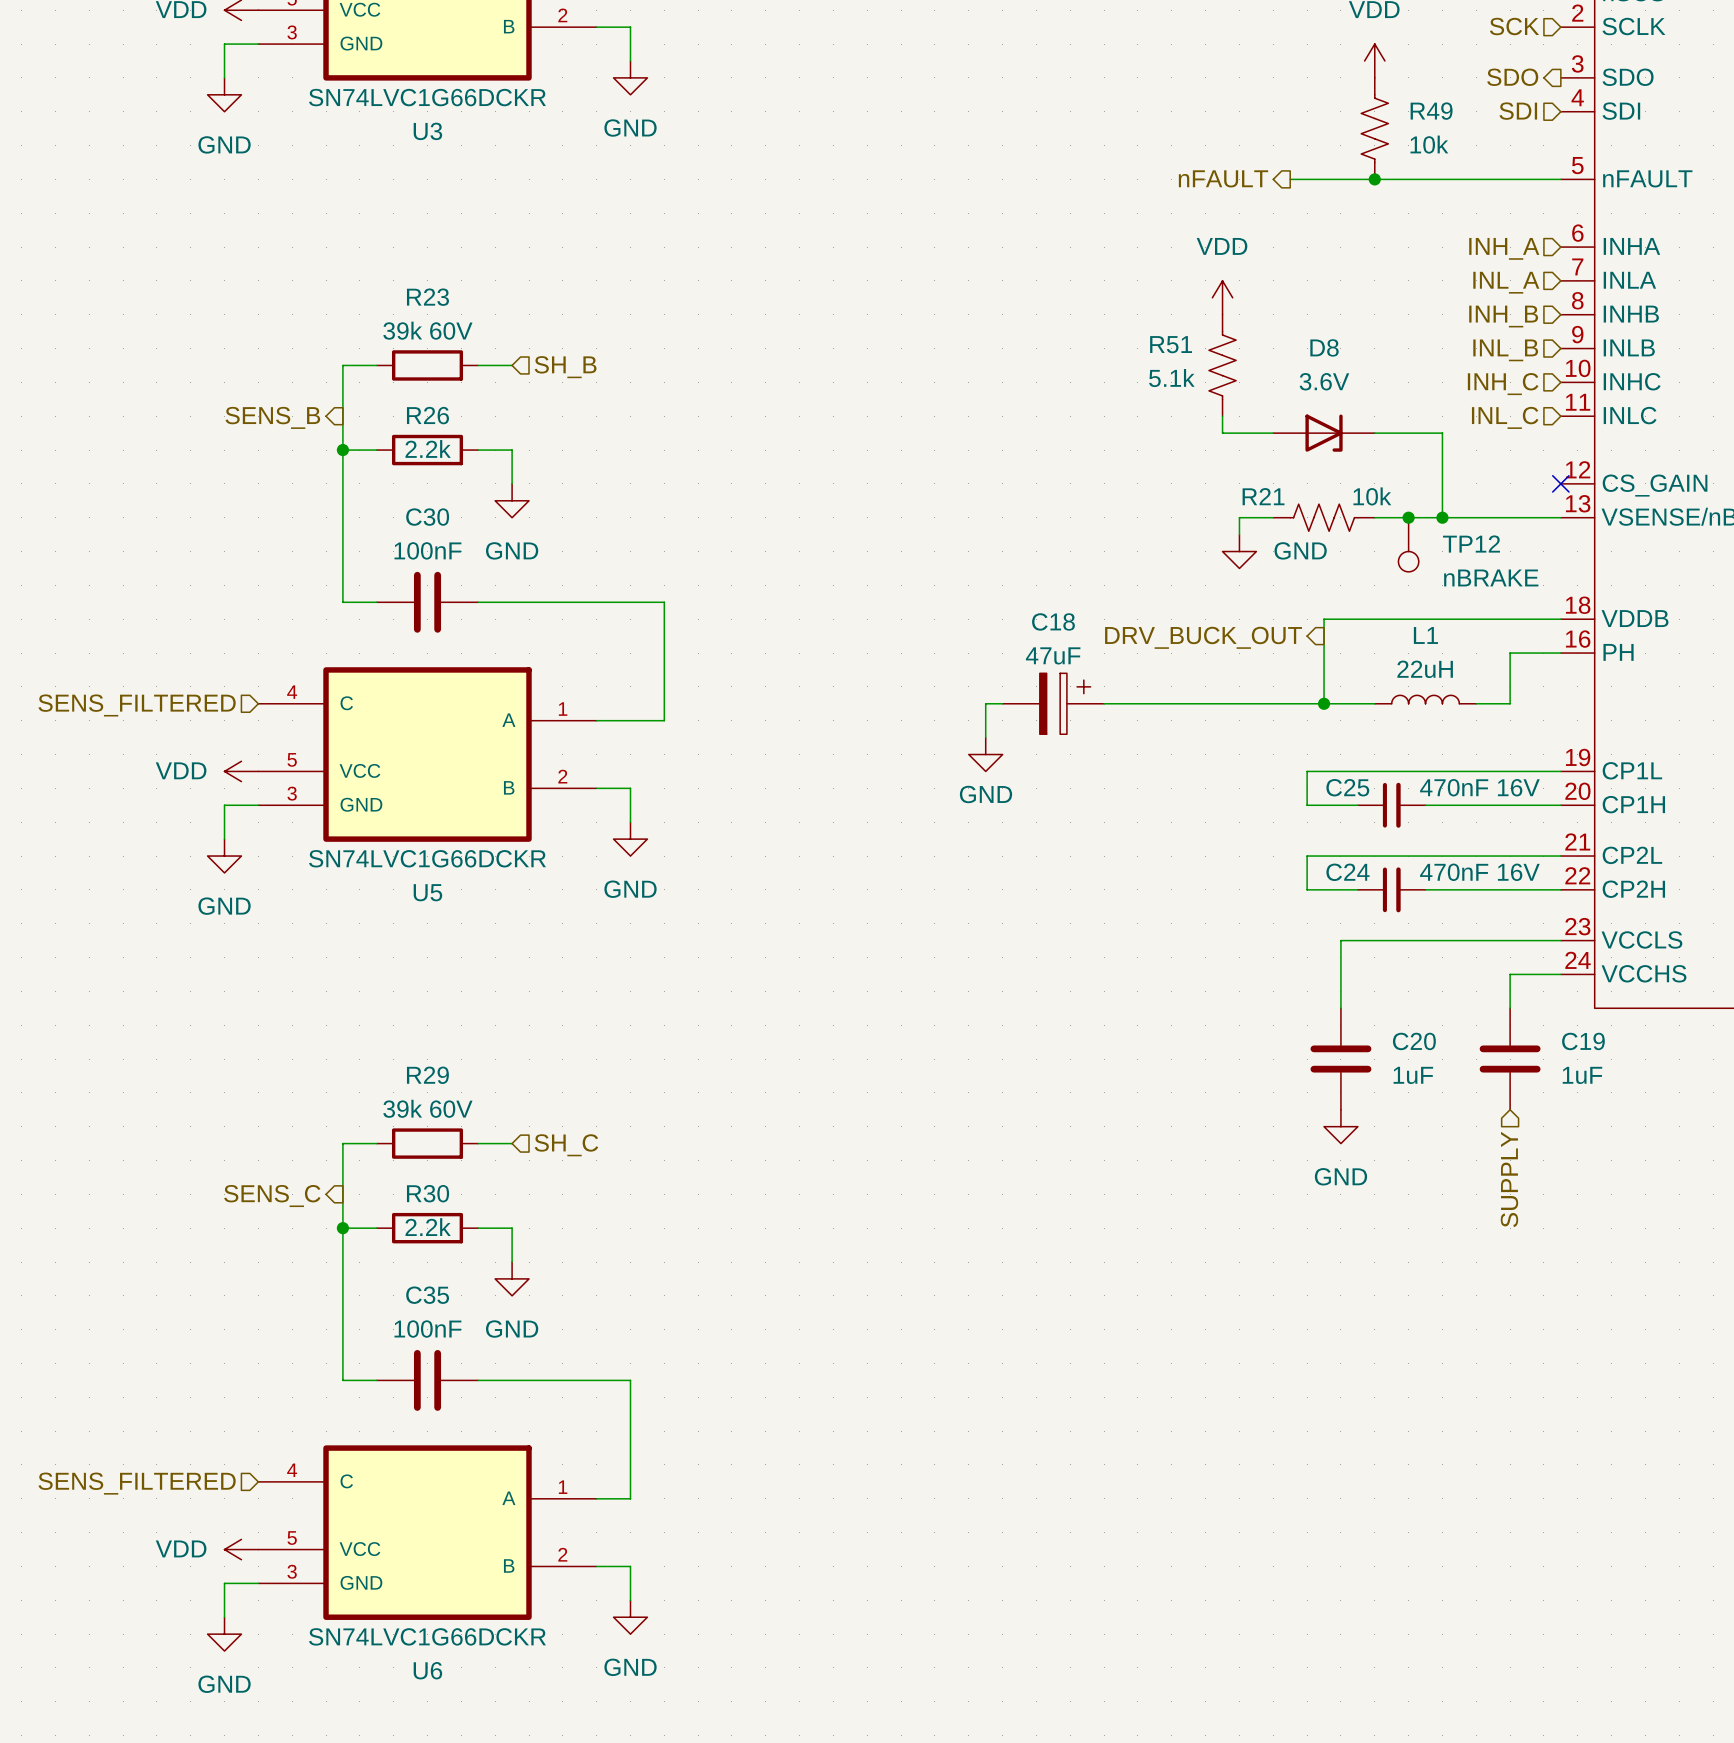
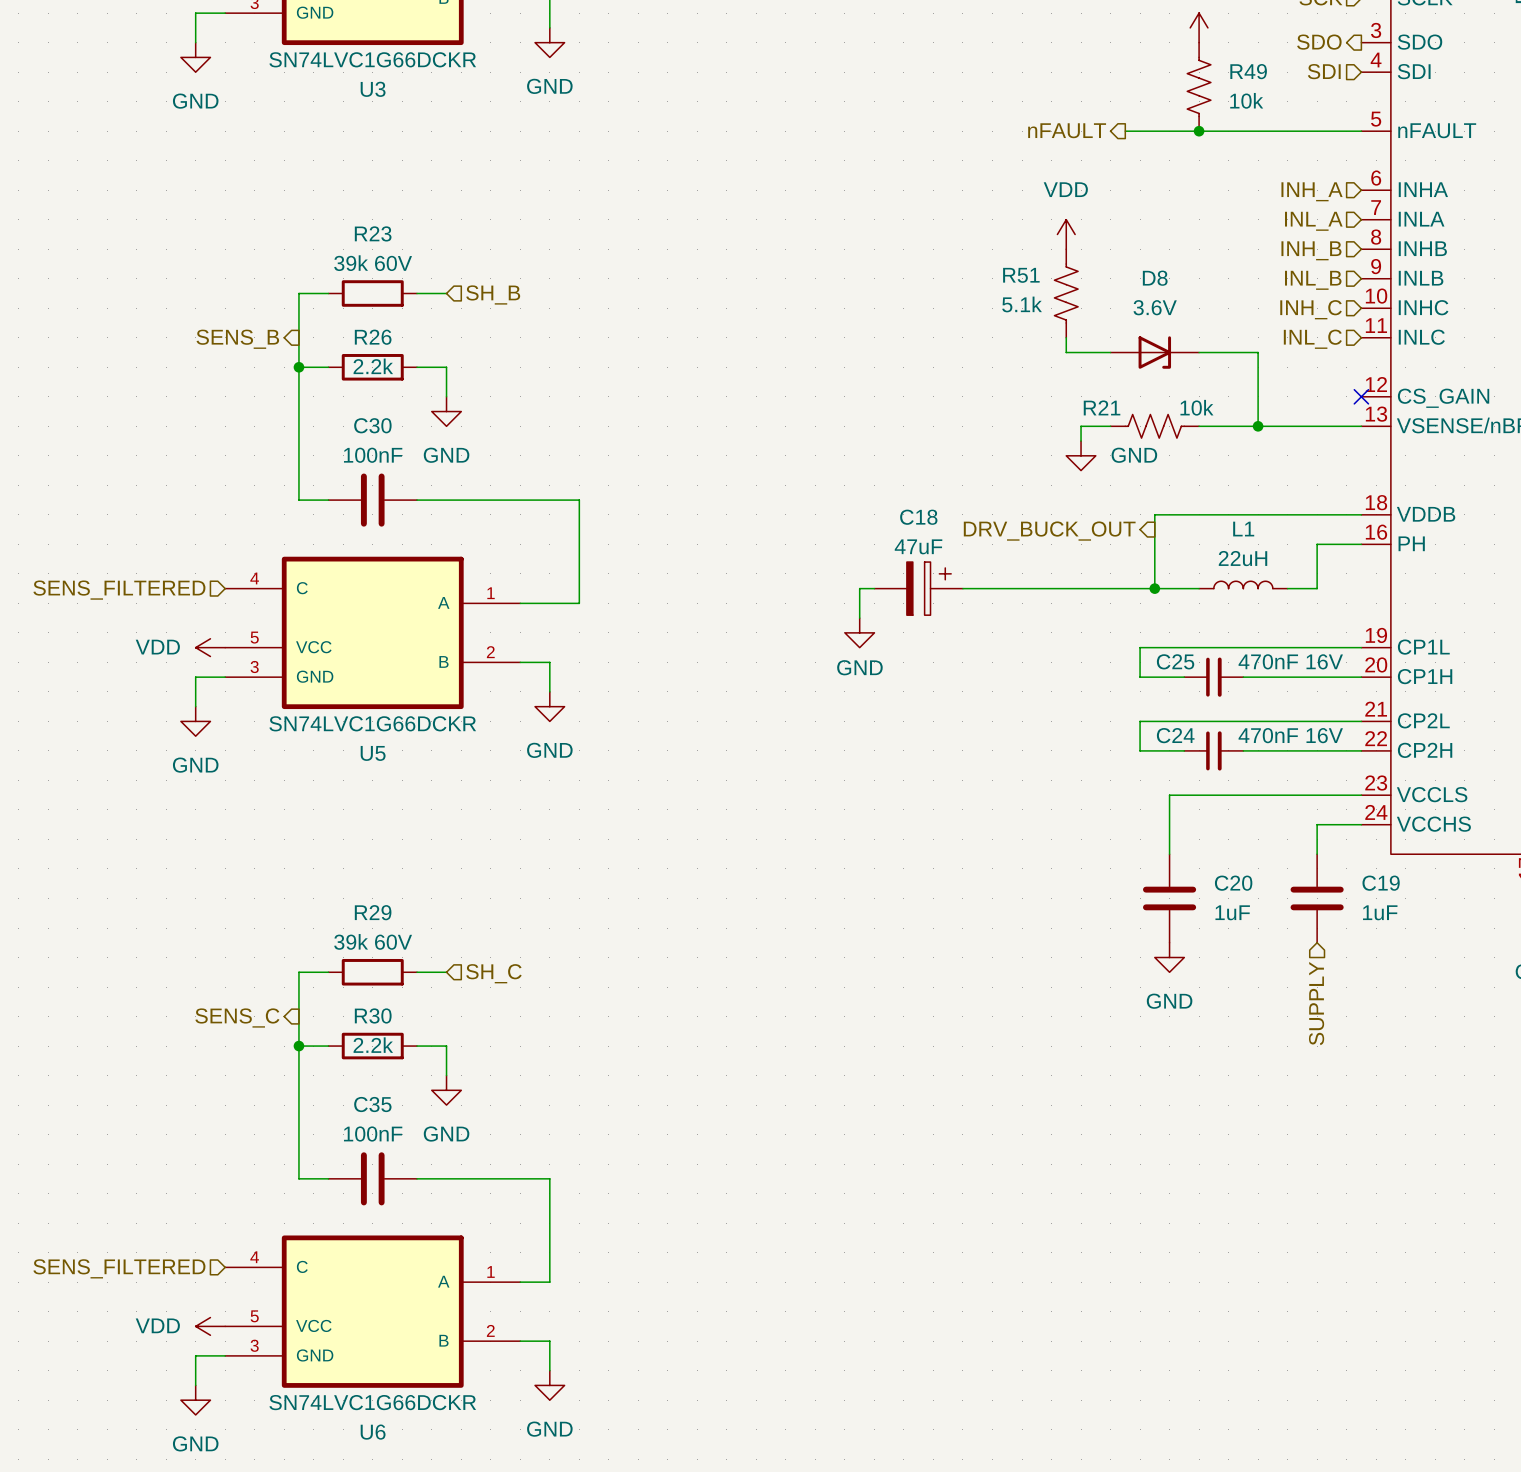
junction: (1408, 517) -> none
TP12: nBRAKE (1408, 544) -> none

